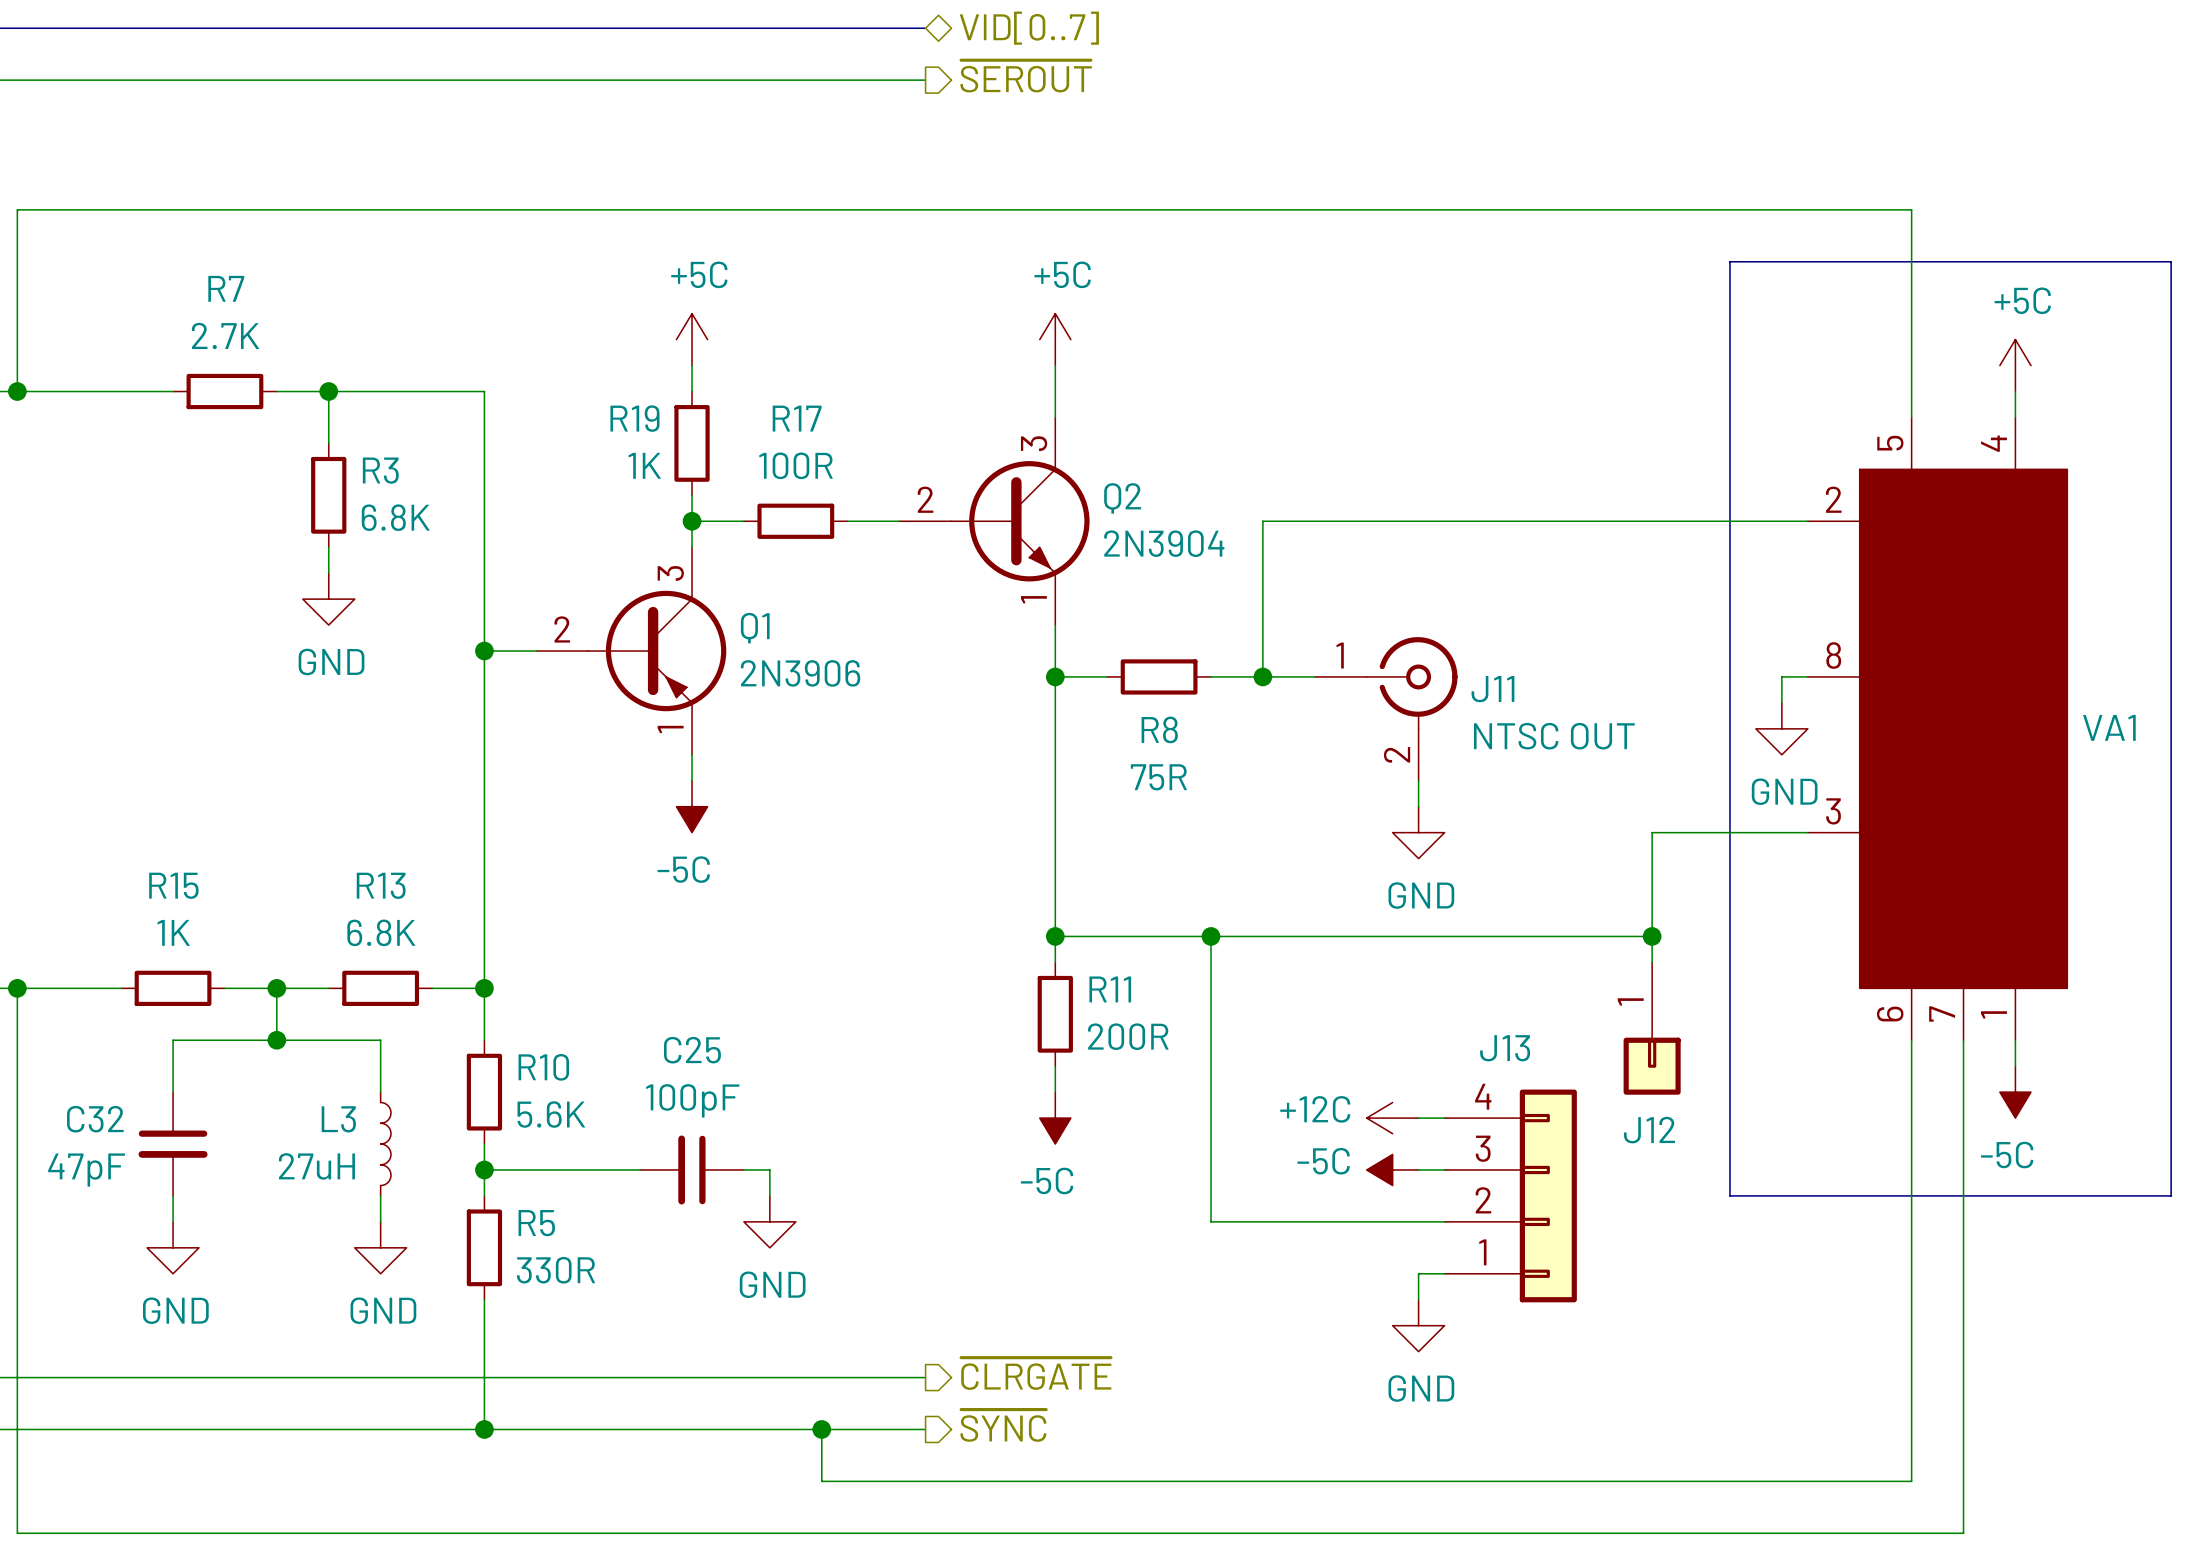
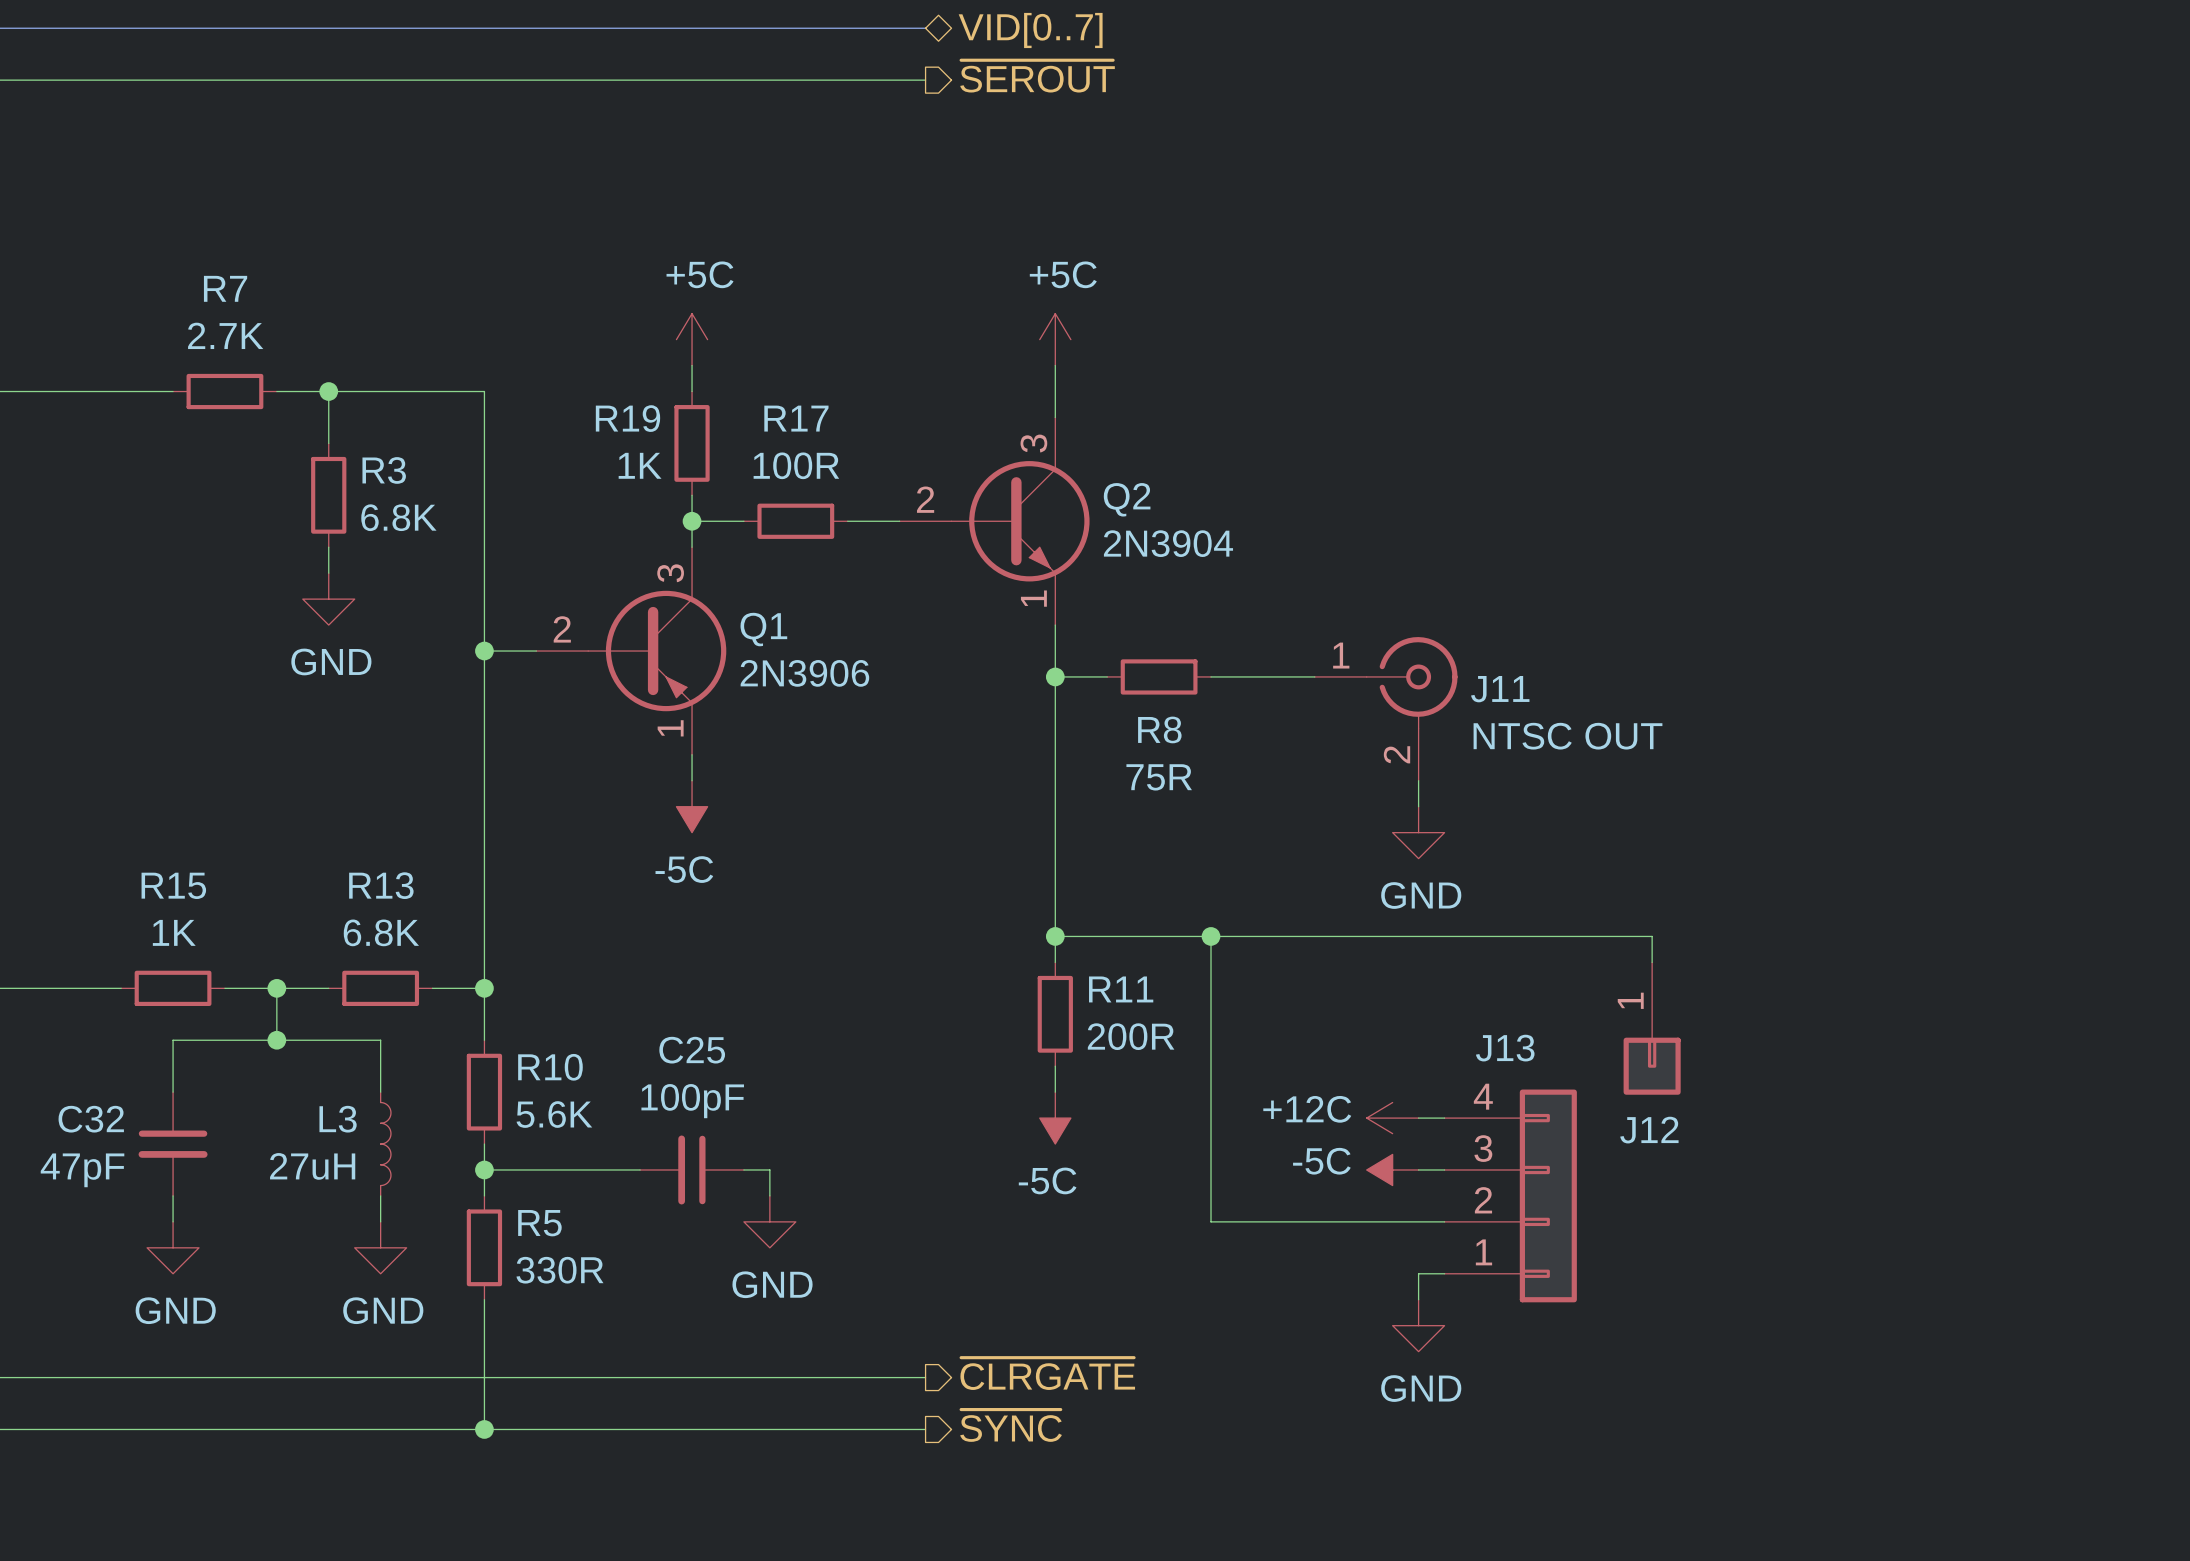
line: (1729, 261) (1729, 1195) (2171, 1195) (2171, 261) (1729, 261) -> none
power symbol: +5C (2015, 365) -> none
wire: (17, 391) (17, 209) (1911, 209) (1911, 417) -> none
junction: (17, 391) -> none
wire: (2015, 391) (2015, 417) -> none
wire: (1807, 521) (1262, 521) (1262, 676) -> none
junction: (1262, 676) -> none
wire: (1807, 676) (1781, 676) (1781, 702) -> none
power symbol: GND (1781, 728) -> none
VA1: (1937, 728) -> none
wire: (1807, 832) (1652, 832) (1652, 936) -> none
junction: (1652, 936) -> none
wire: (17, 988) (17, 1533) (1963, 1533) (1963, 1040) -> none
junction: (17, 988) -> none
wire: (1911, 1040) (1911, 1481) (821, 1481) (821, 1429) -> none
wire: (2015, 1040) (2015, 1066) -> none
power symbol: -5C (2015, 1092) -> none
junction: (821, 1429) -> none

